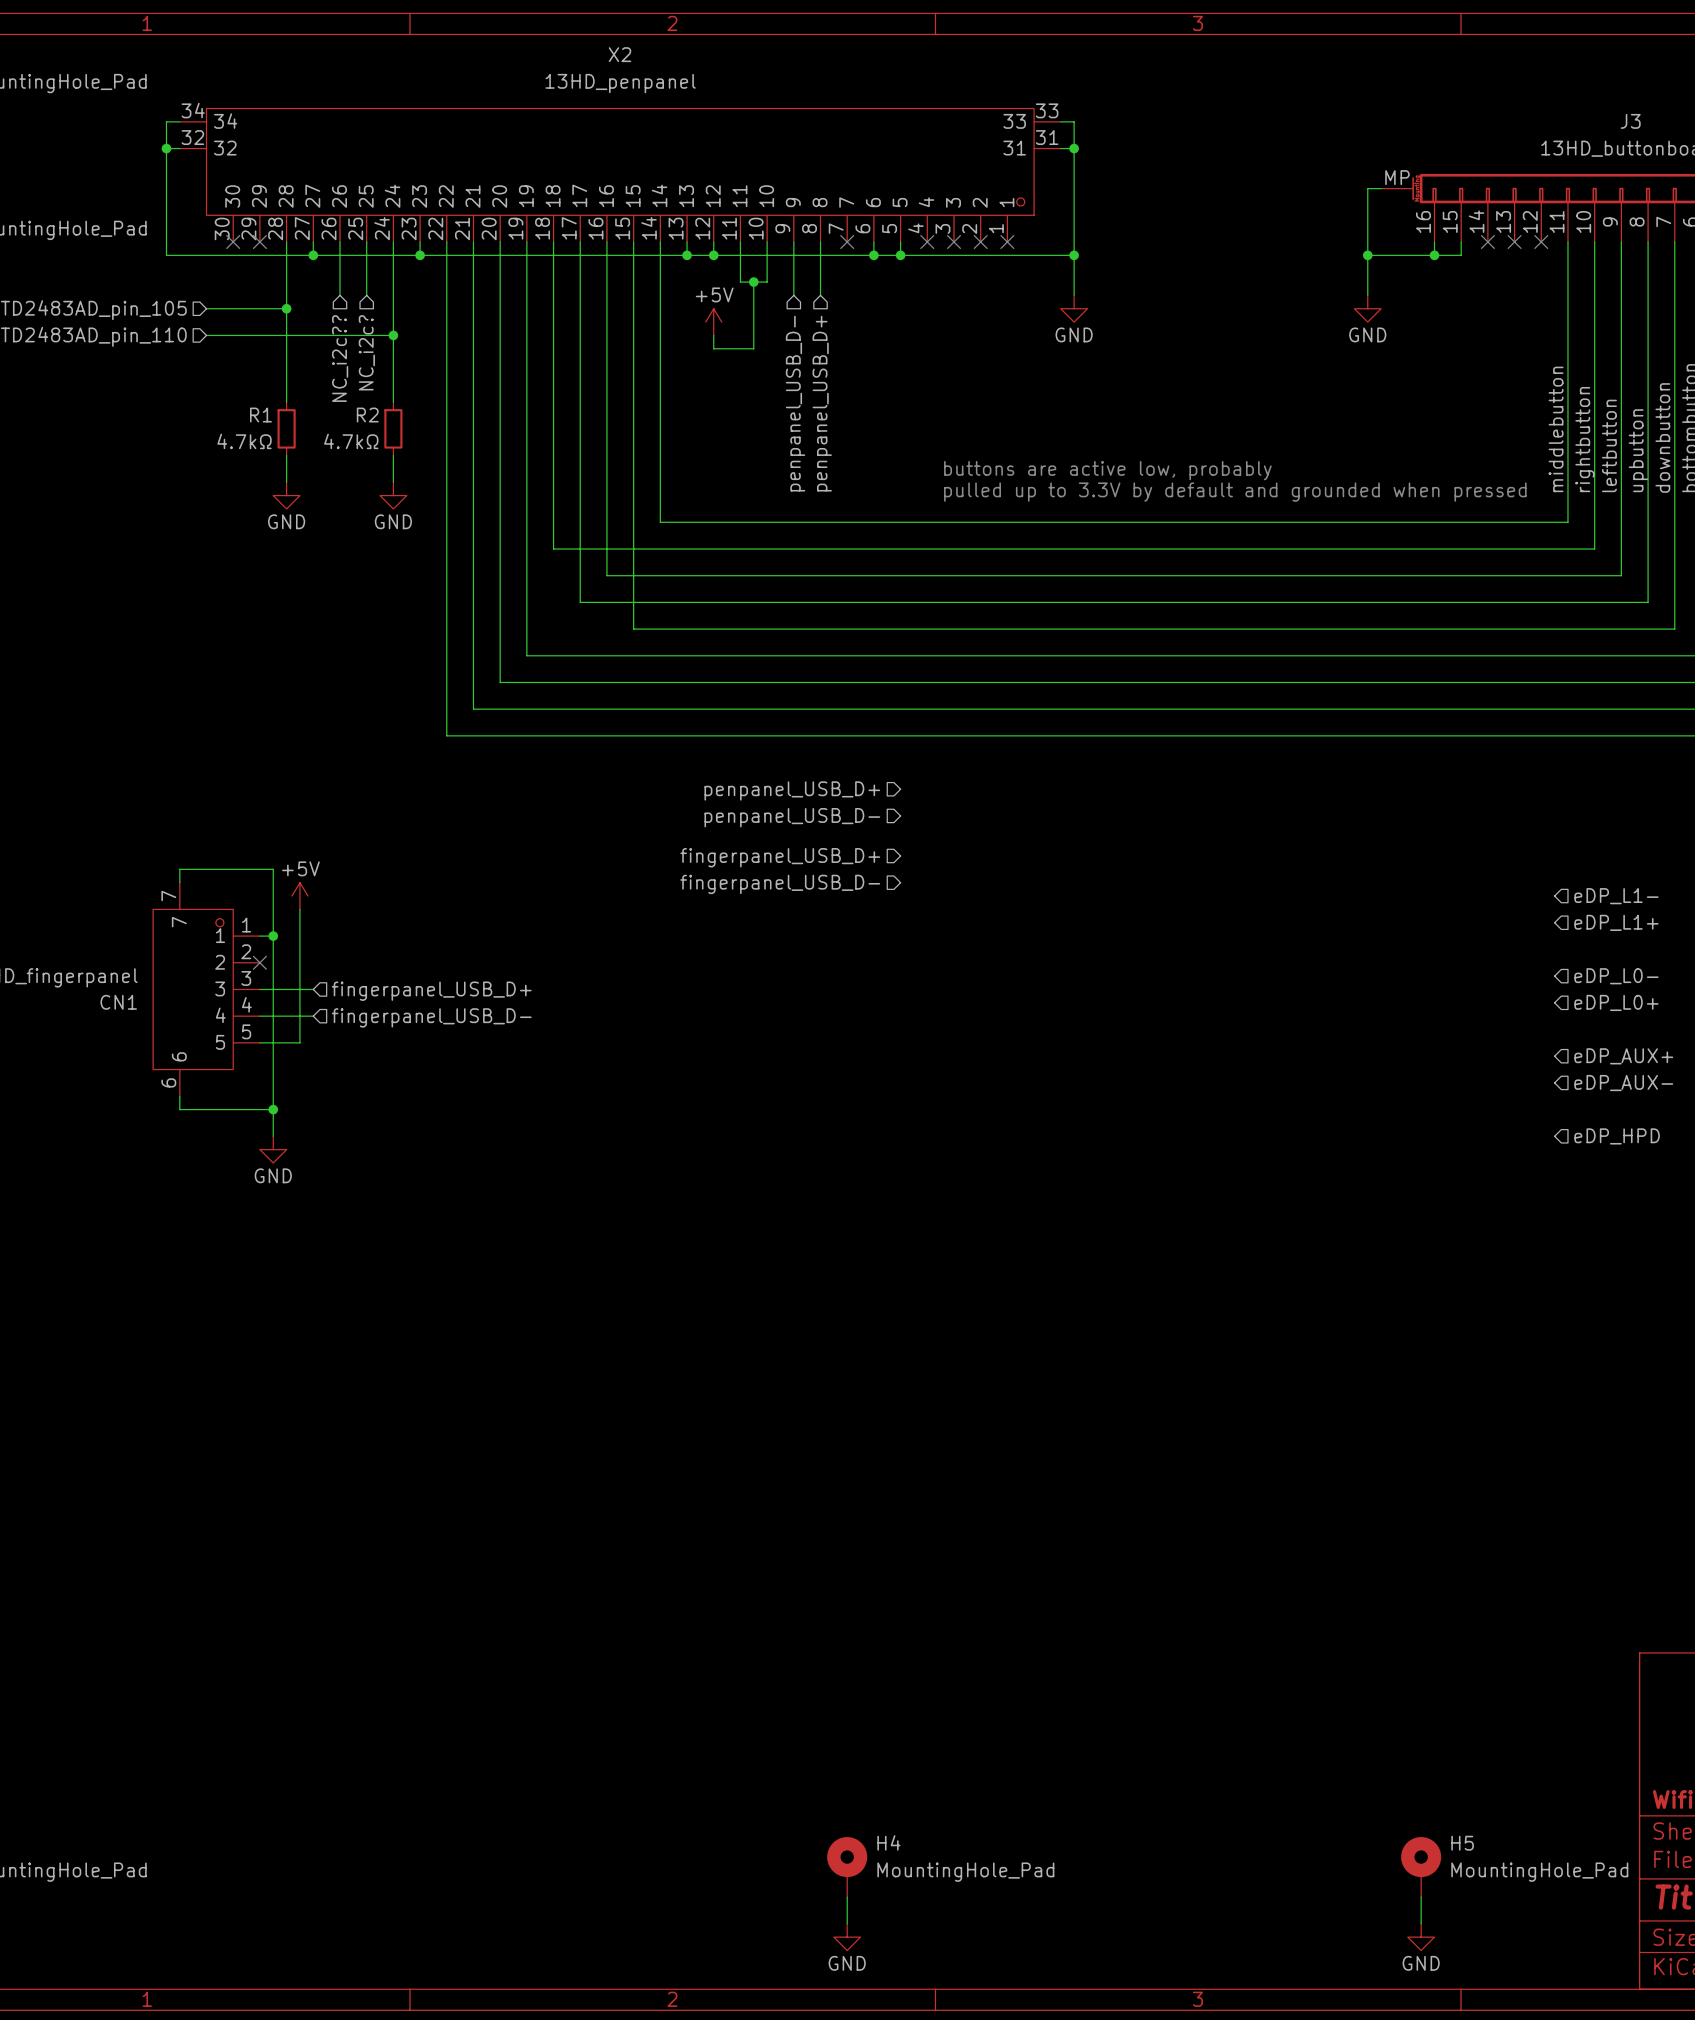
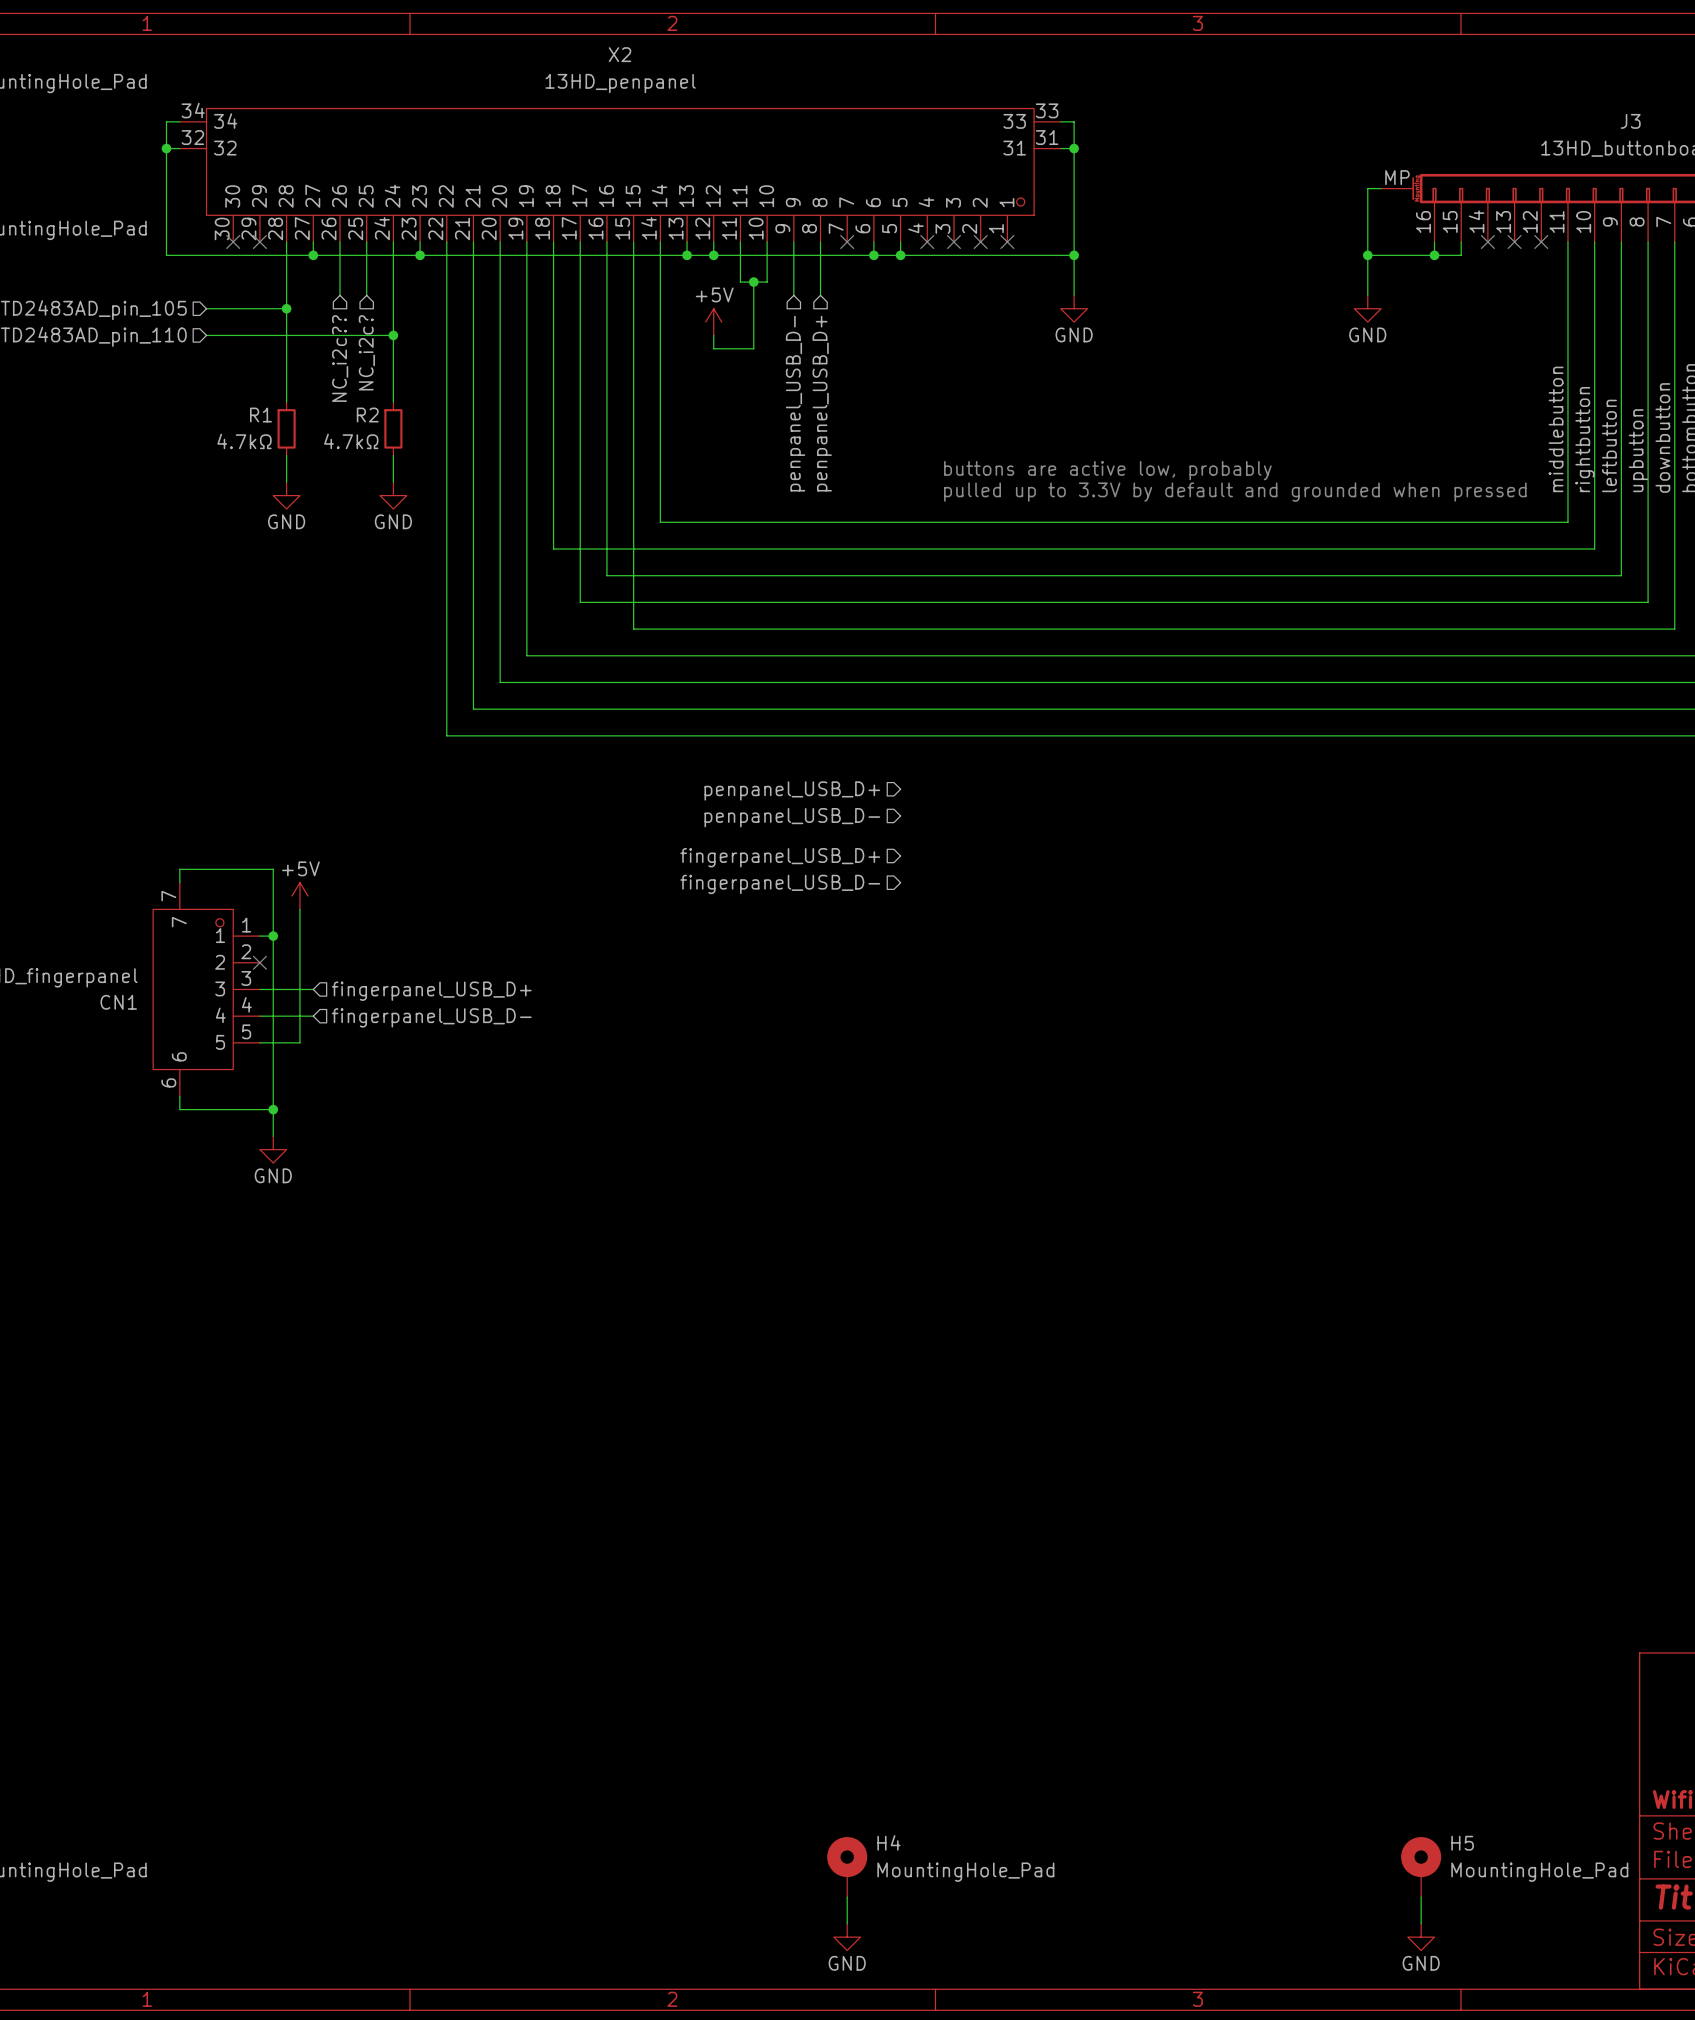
hierarchical label: eDP_L1- (1616, 896) -> none
hierarchical label: eDP_L1+ (1616, 922) -> none
hierarchical label: eDP_L0- (1616, 976) -> none
hierarchical label: eDP_L0+ (1616, 1002) -> none
hierarchical label: eDP_AUX+ (1623, 1056) -> none
hierarchical label: eDP_AUX- (1623, 1083) -> none
hierarchical label: eDP_HPD (1617, 1136) -> none

